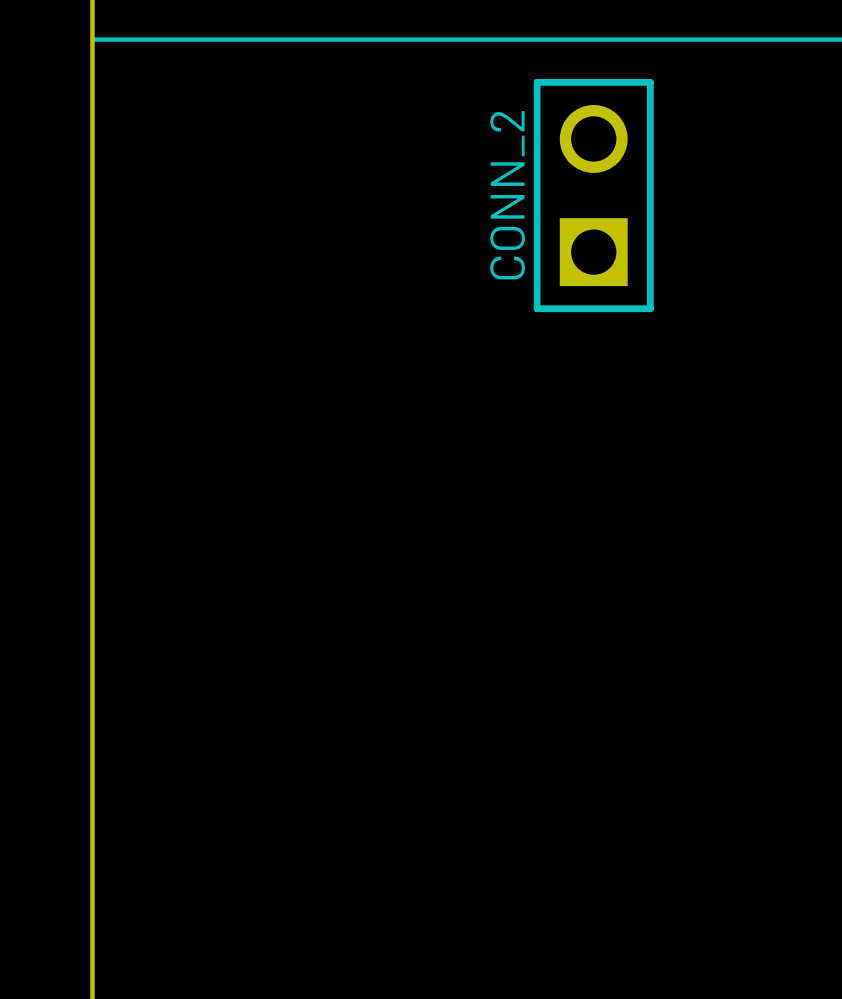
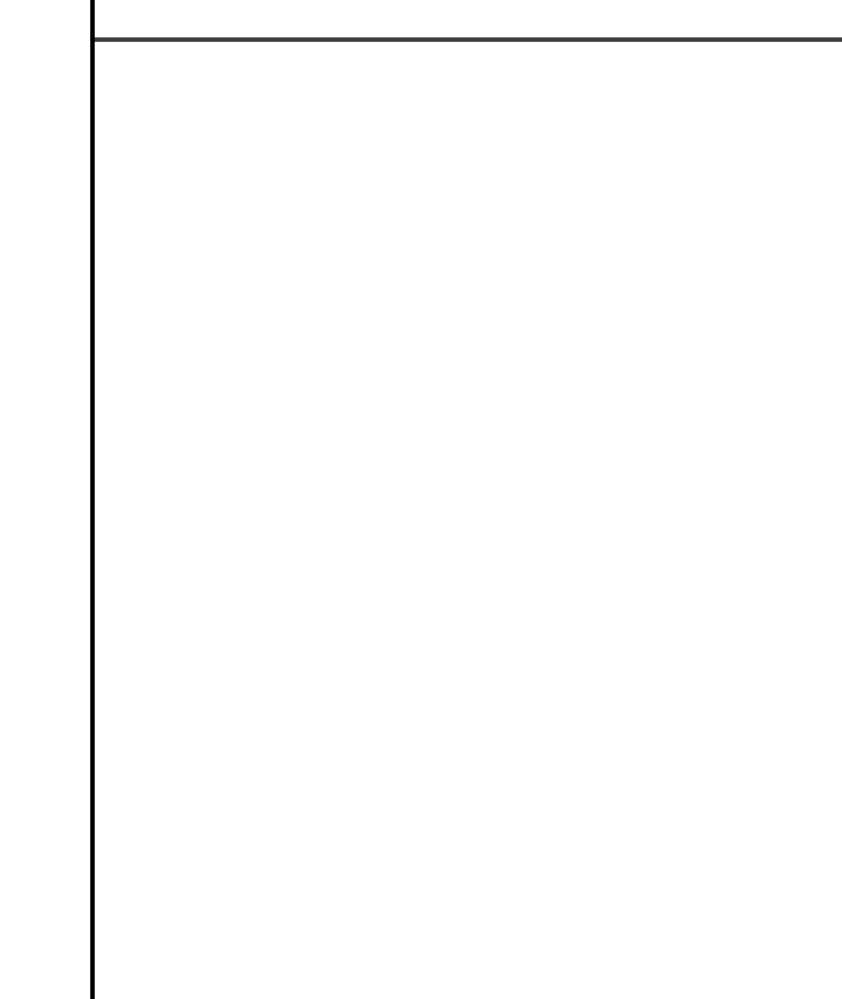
CONN_2: (593, 195) -> none

